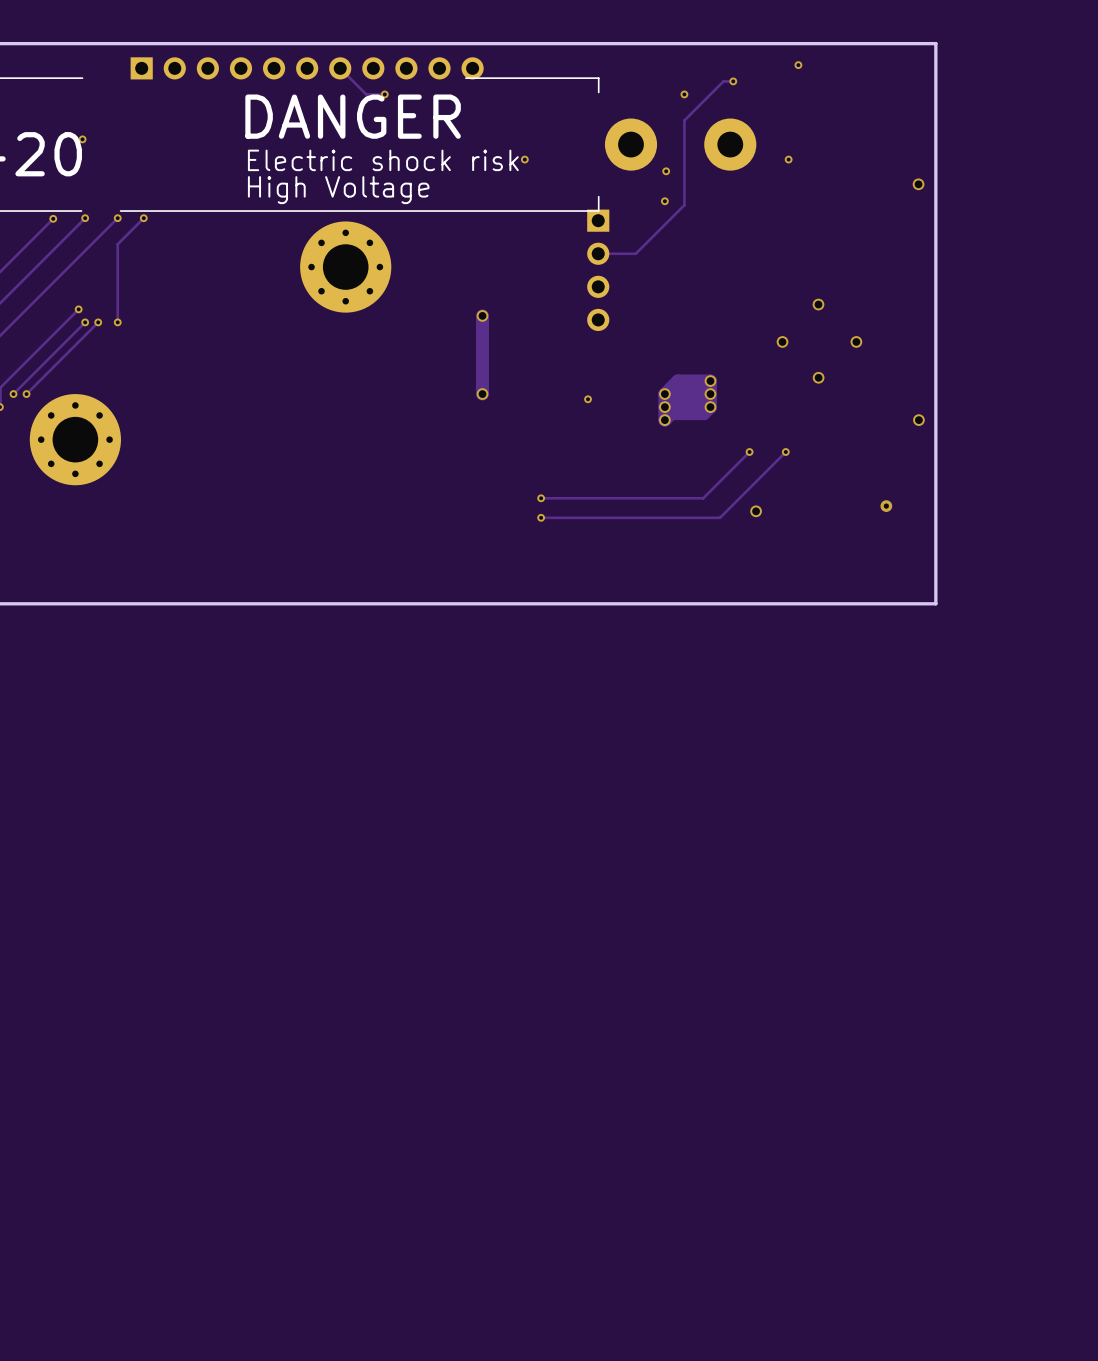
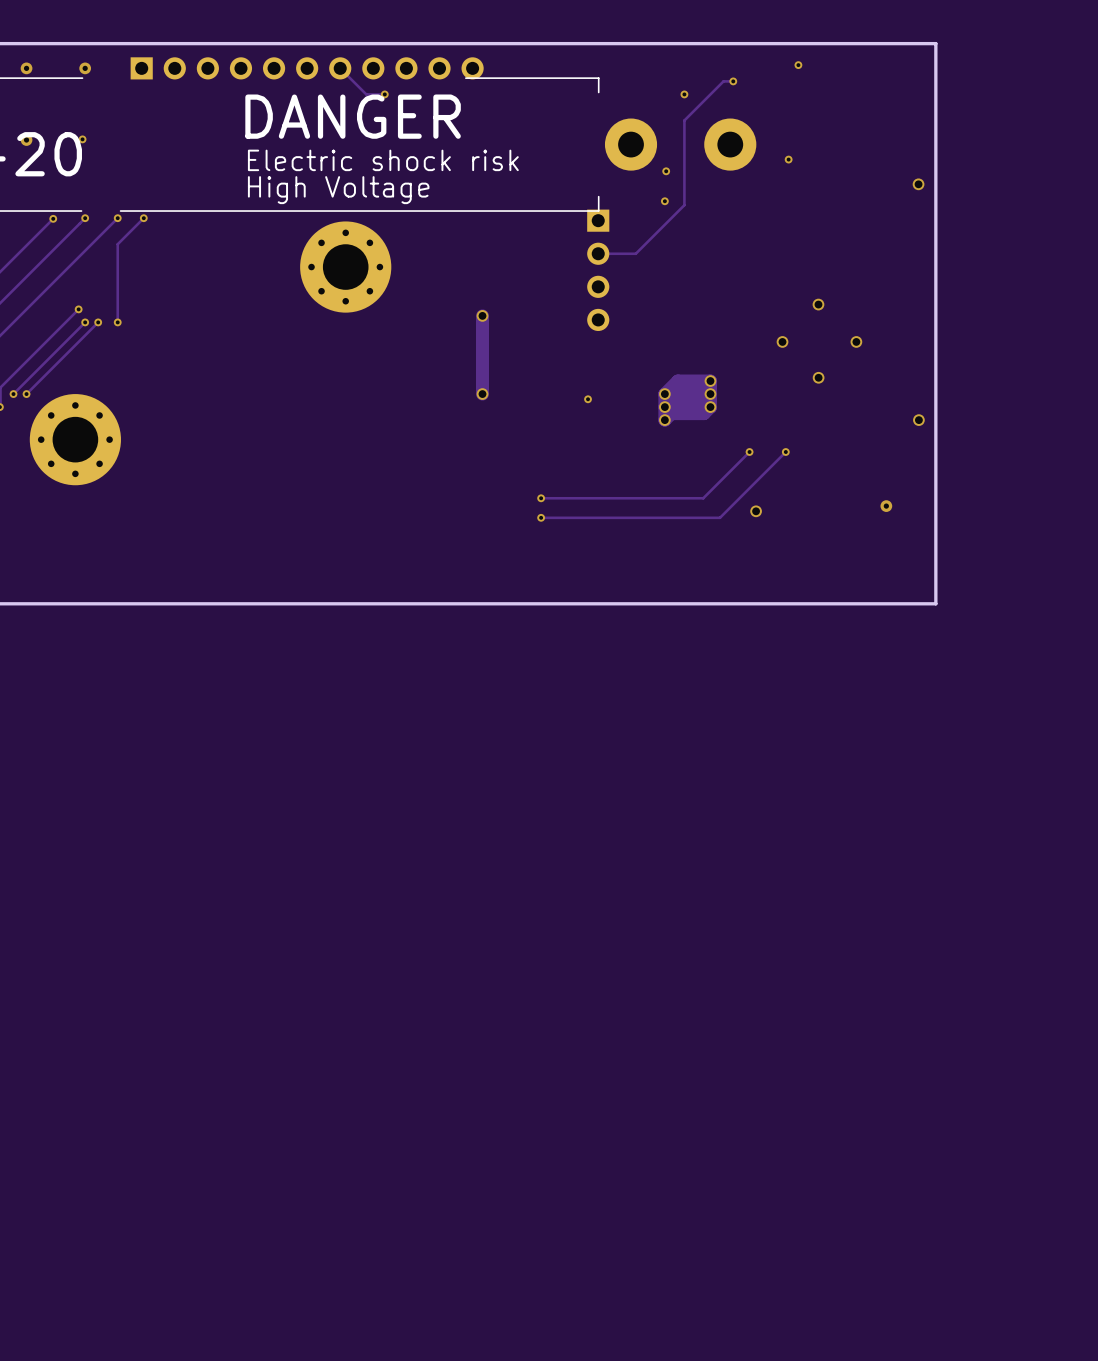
via: none -> (26, 68)
via: none -> (85, 68)
via: none -> (26, 140)
via: (524, 159) -> none

